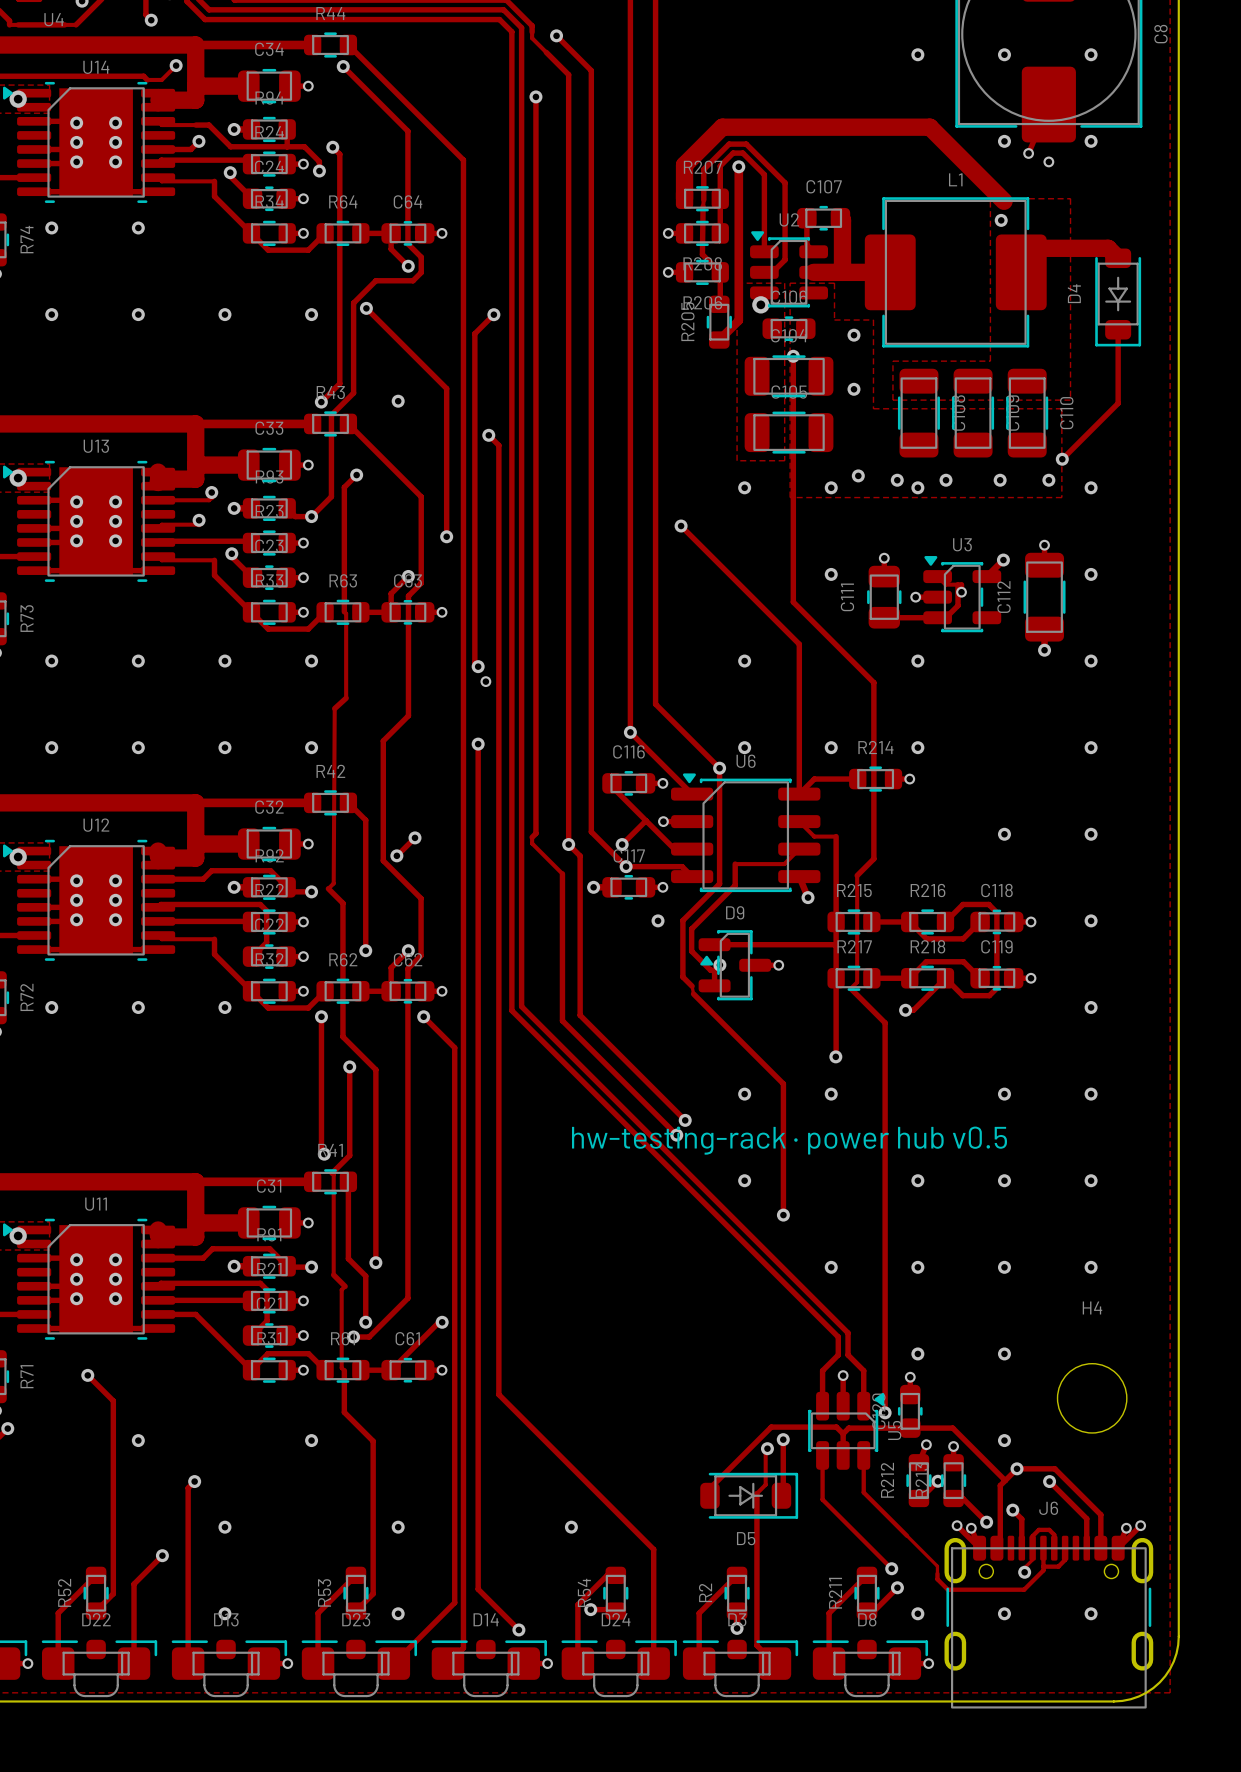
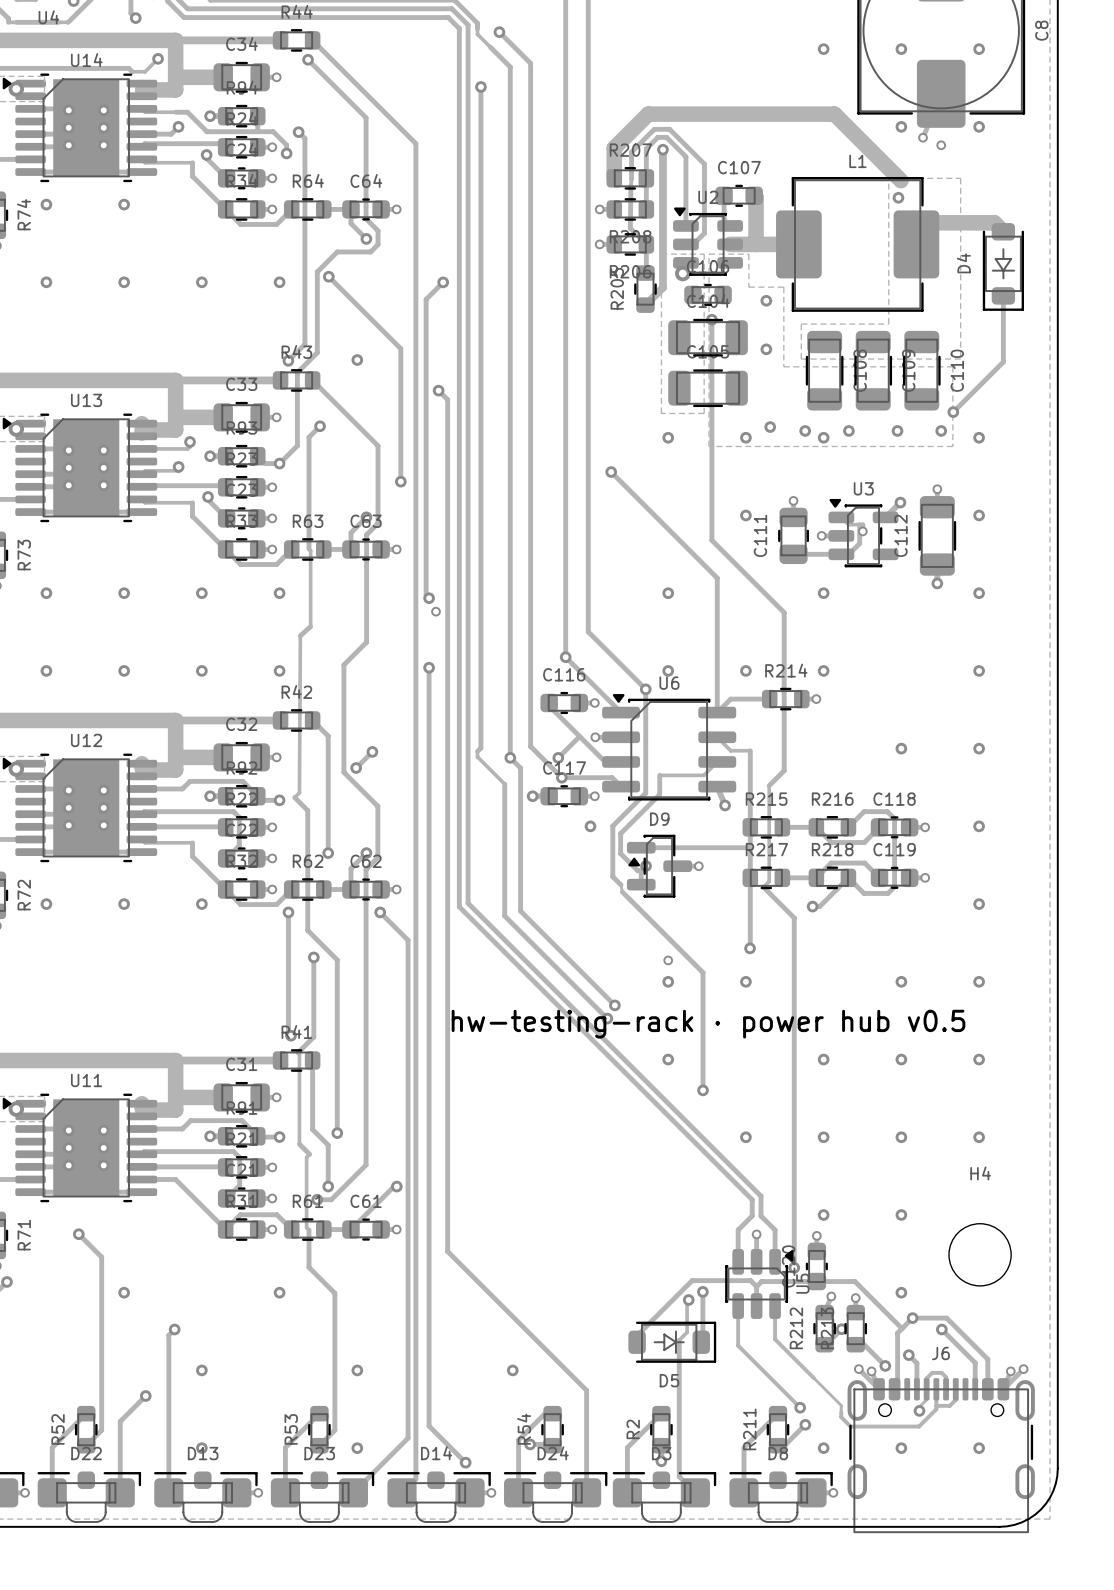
via: none -> (668, 960)

